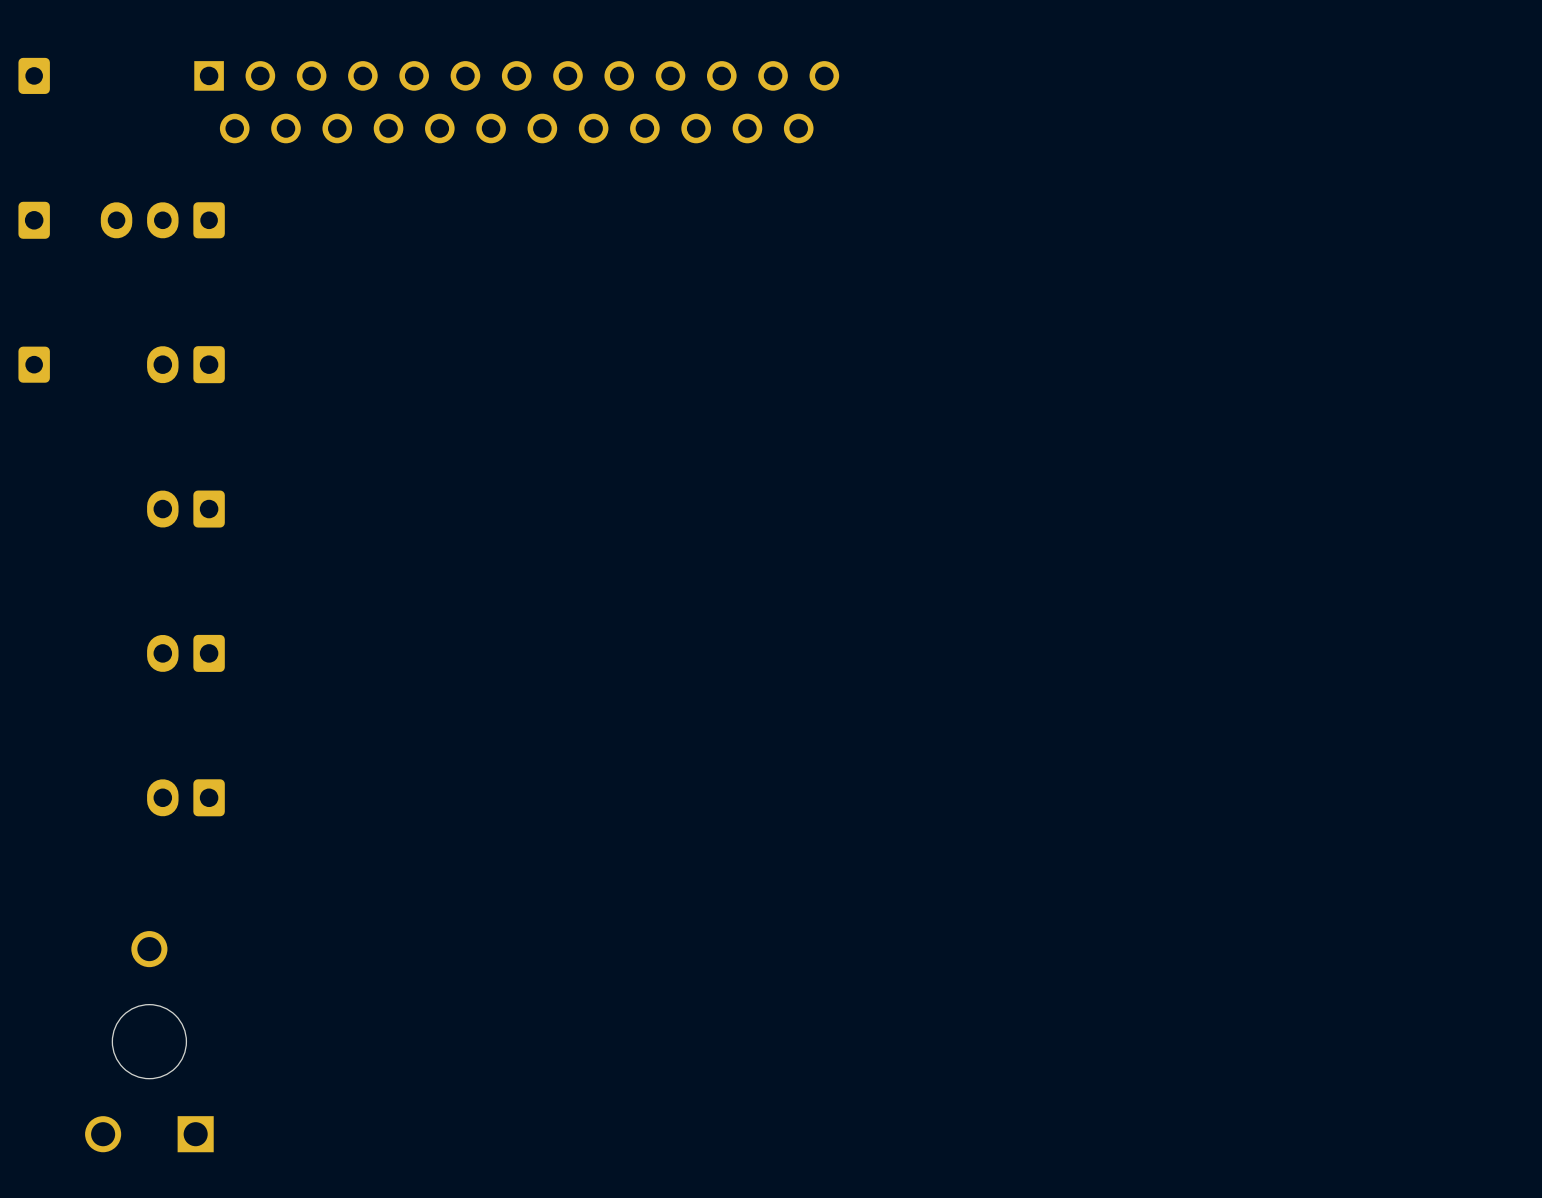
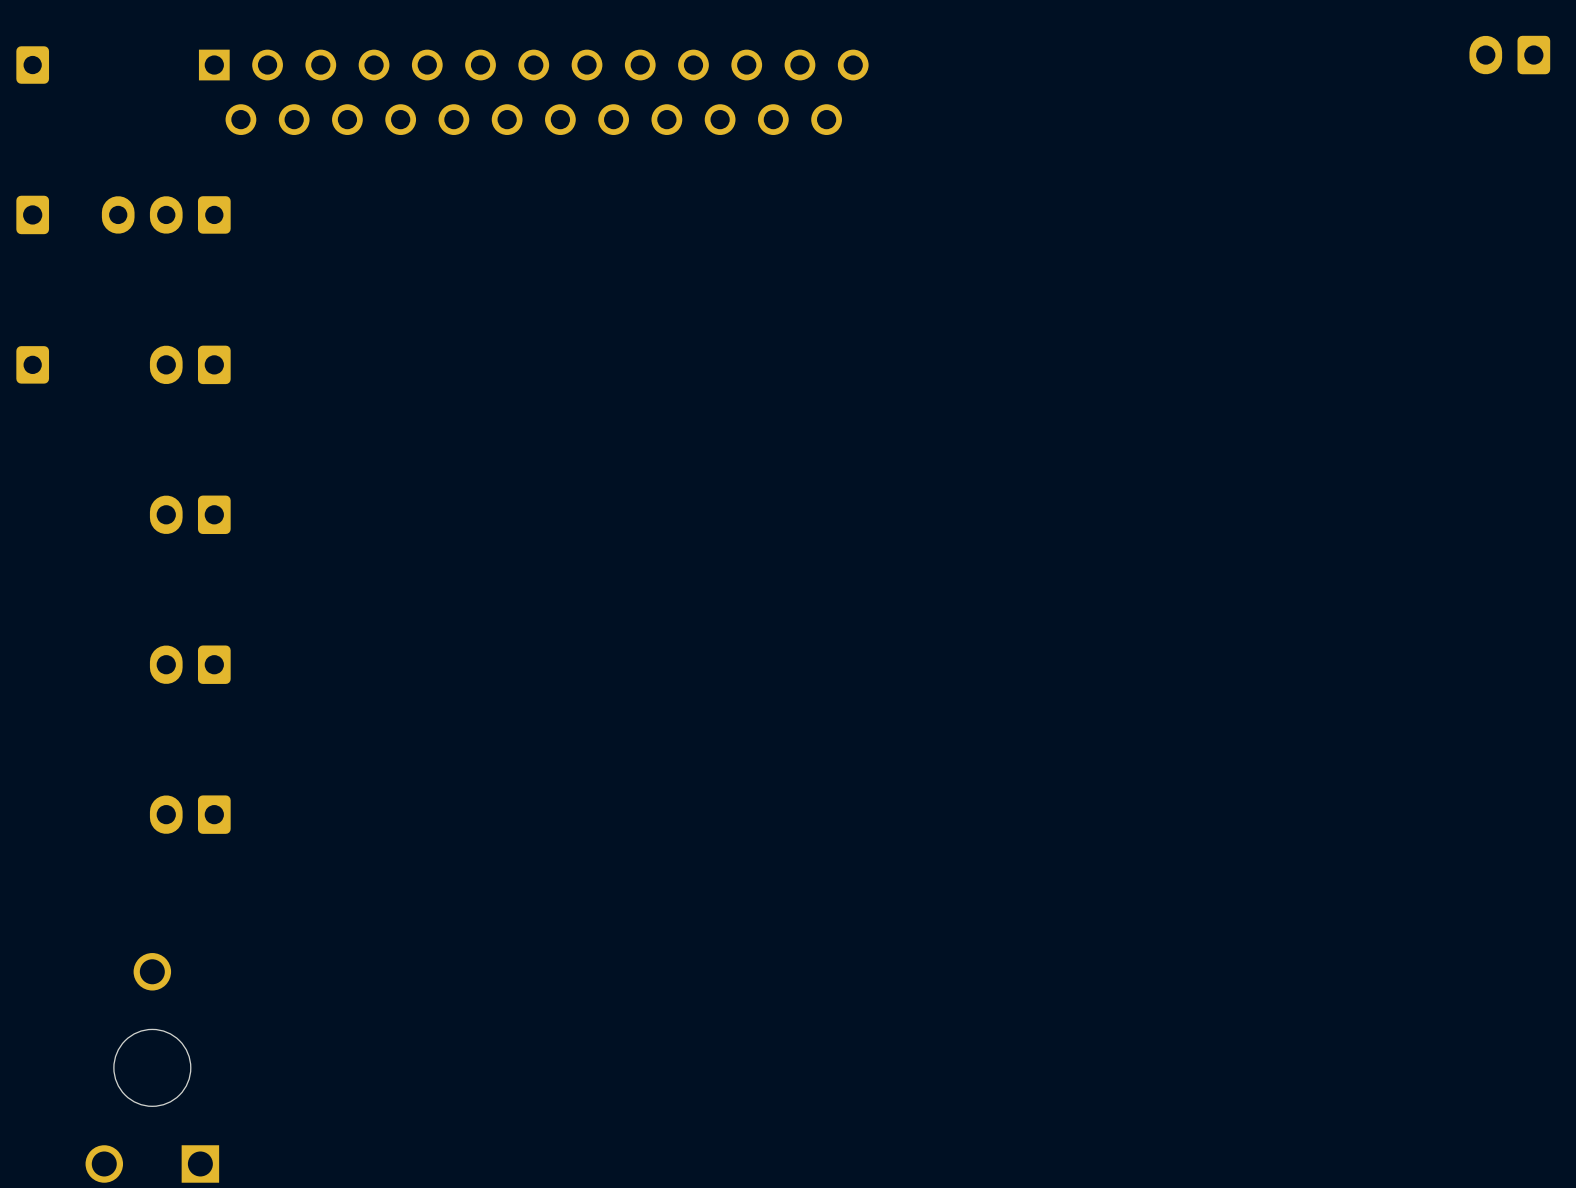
part: none -> (1509, 55)

